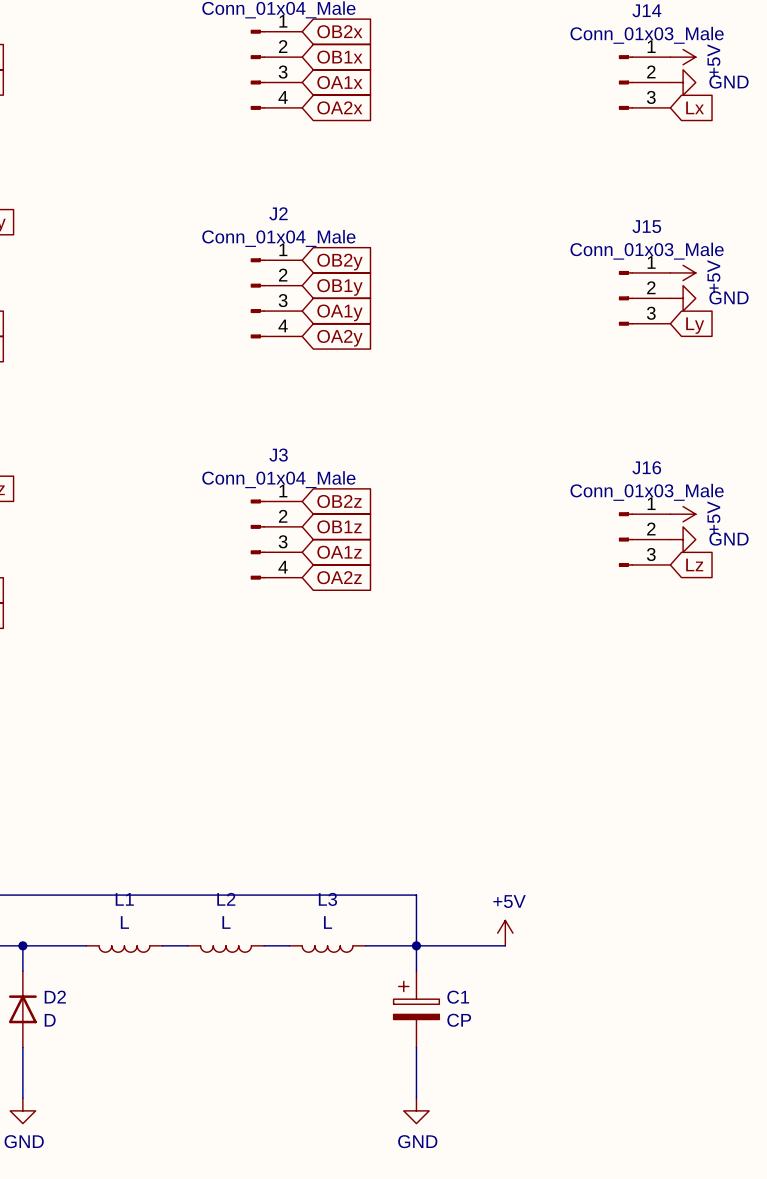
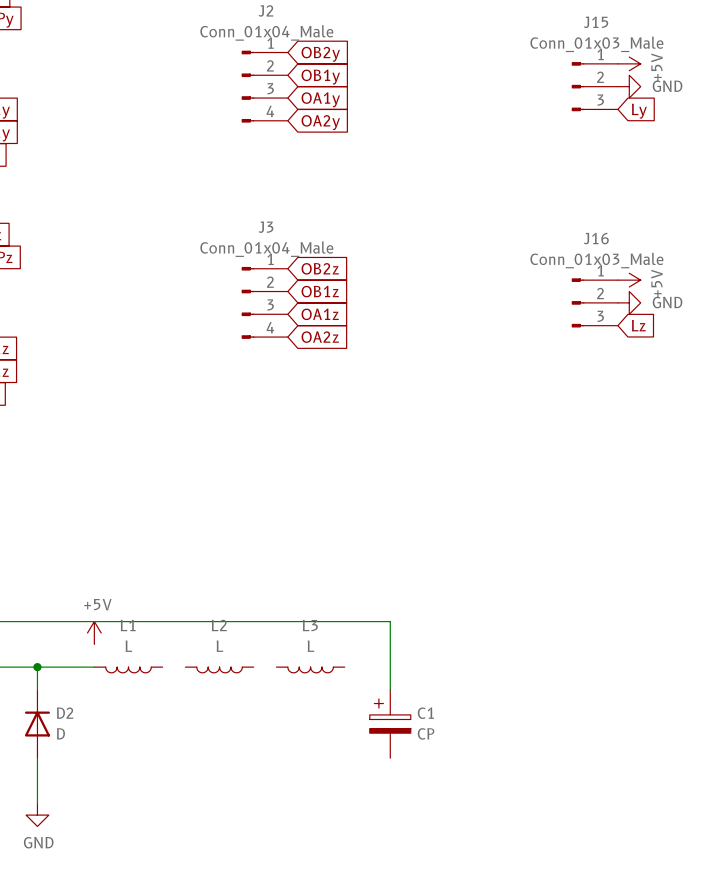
power symbol: none -> +5V (94, 632)
power symbol: +5V (505, 933) -> none
wire: (162, 945) (187, 945) -> none
wire: (264, 945) (289, 945) -> none
wire: (365, 945) (505, 945) -> none
junction: (416, 945) -> none
wire: (416, 1047) (416, 1098) -> none
power symbol: GND (416, 1110) -> none

